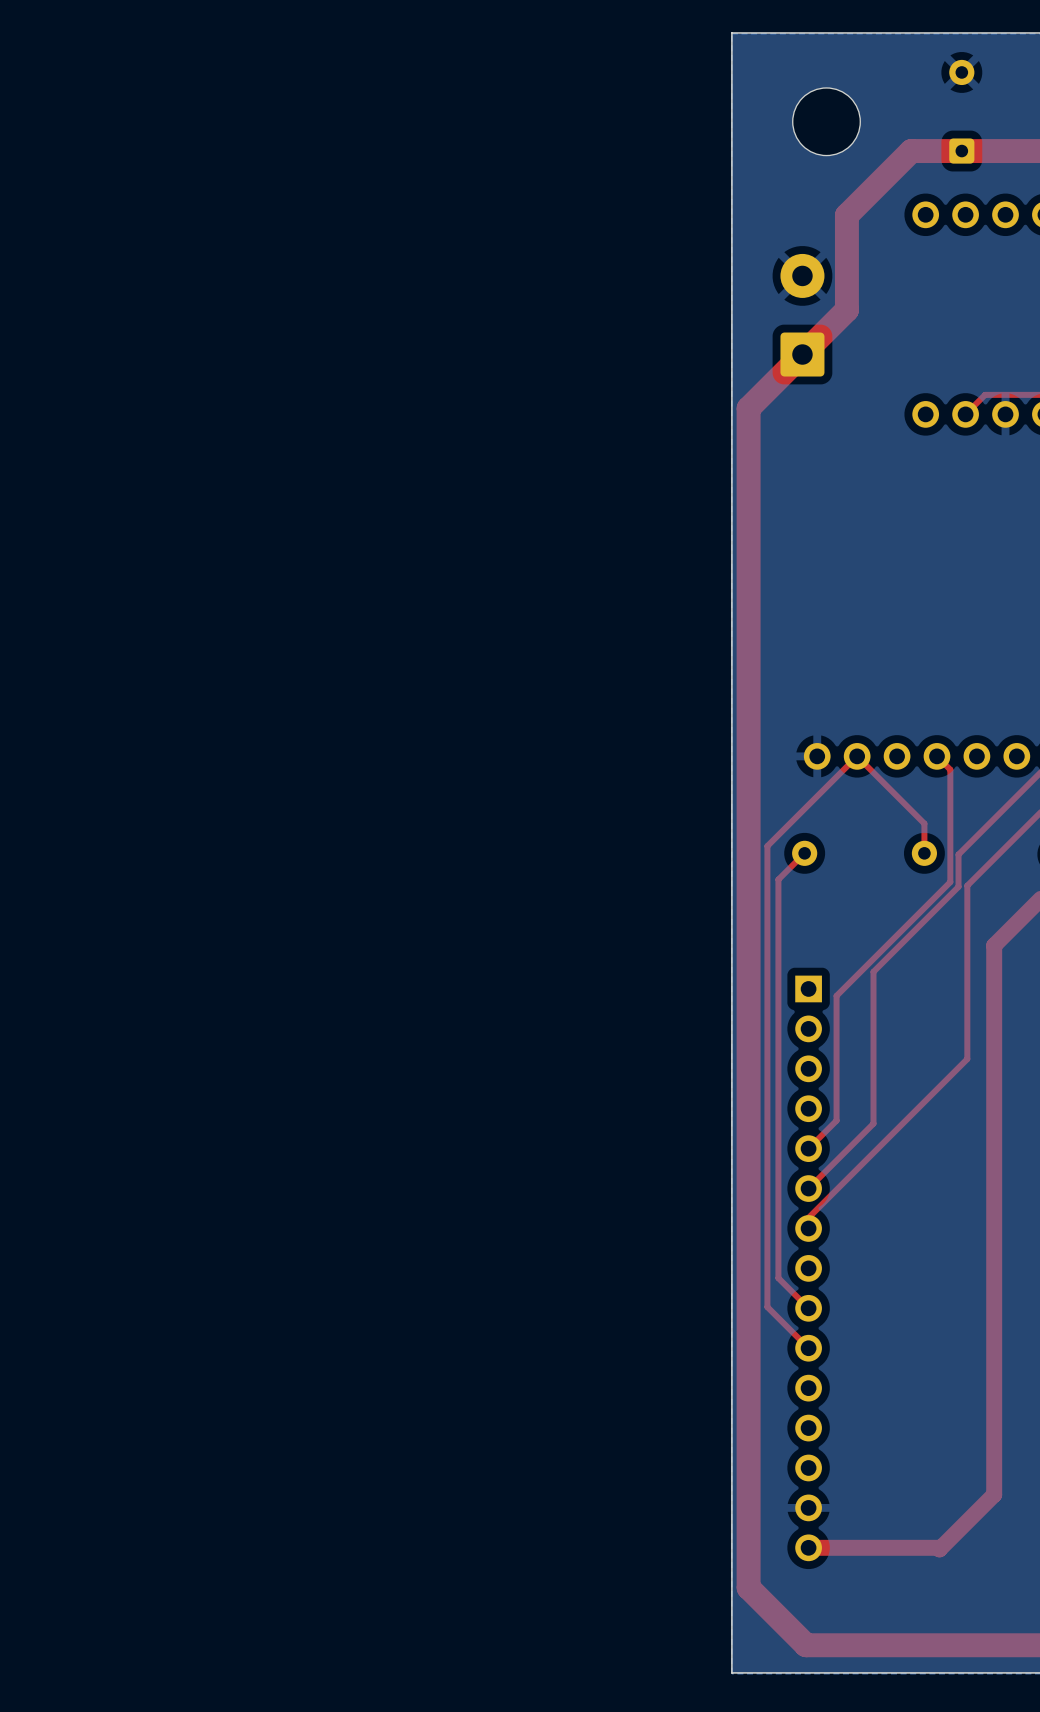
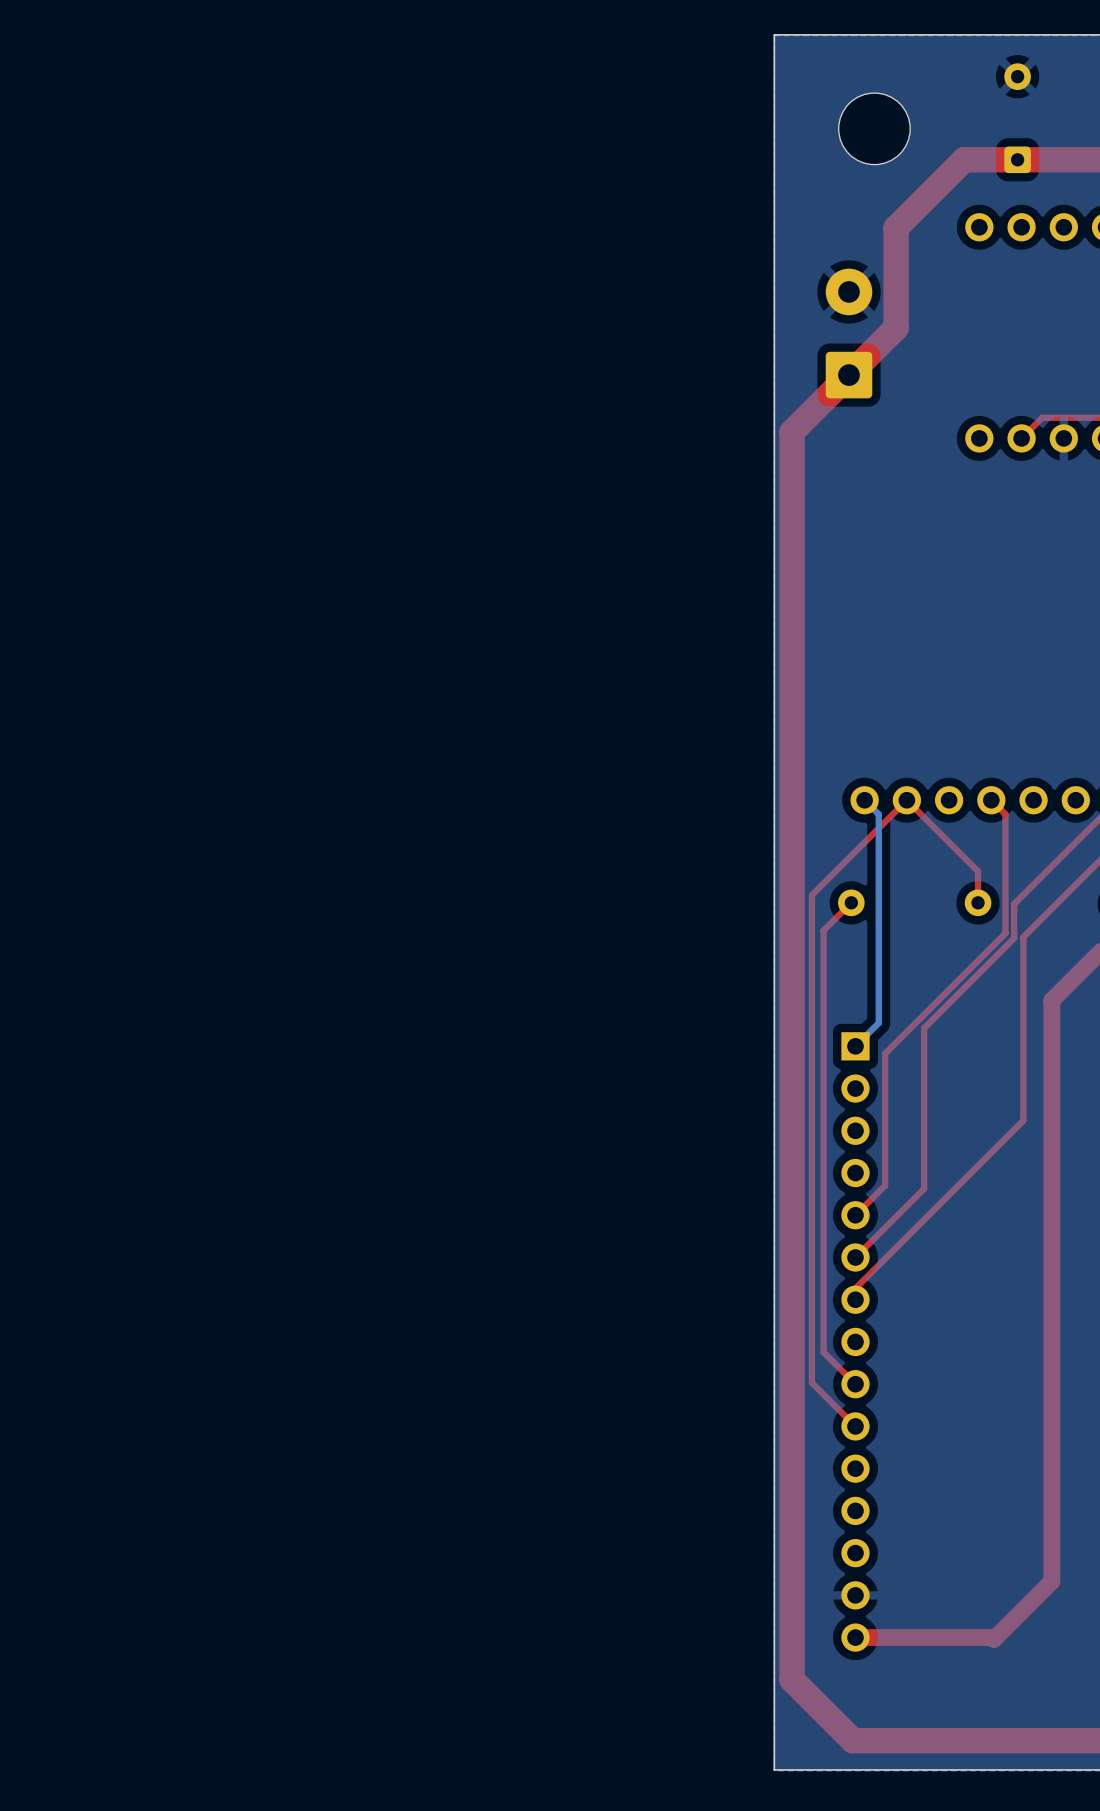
bottom track: none -> (864, 800) (878, 814) (878, 1023) (855, 1046)

